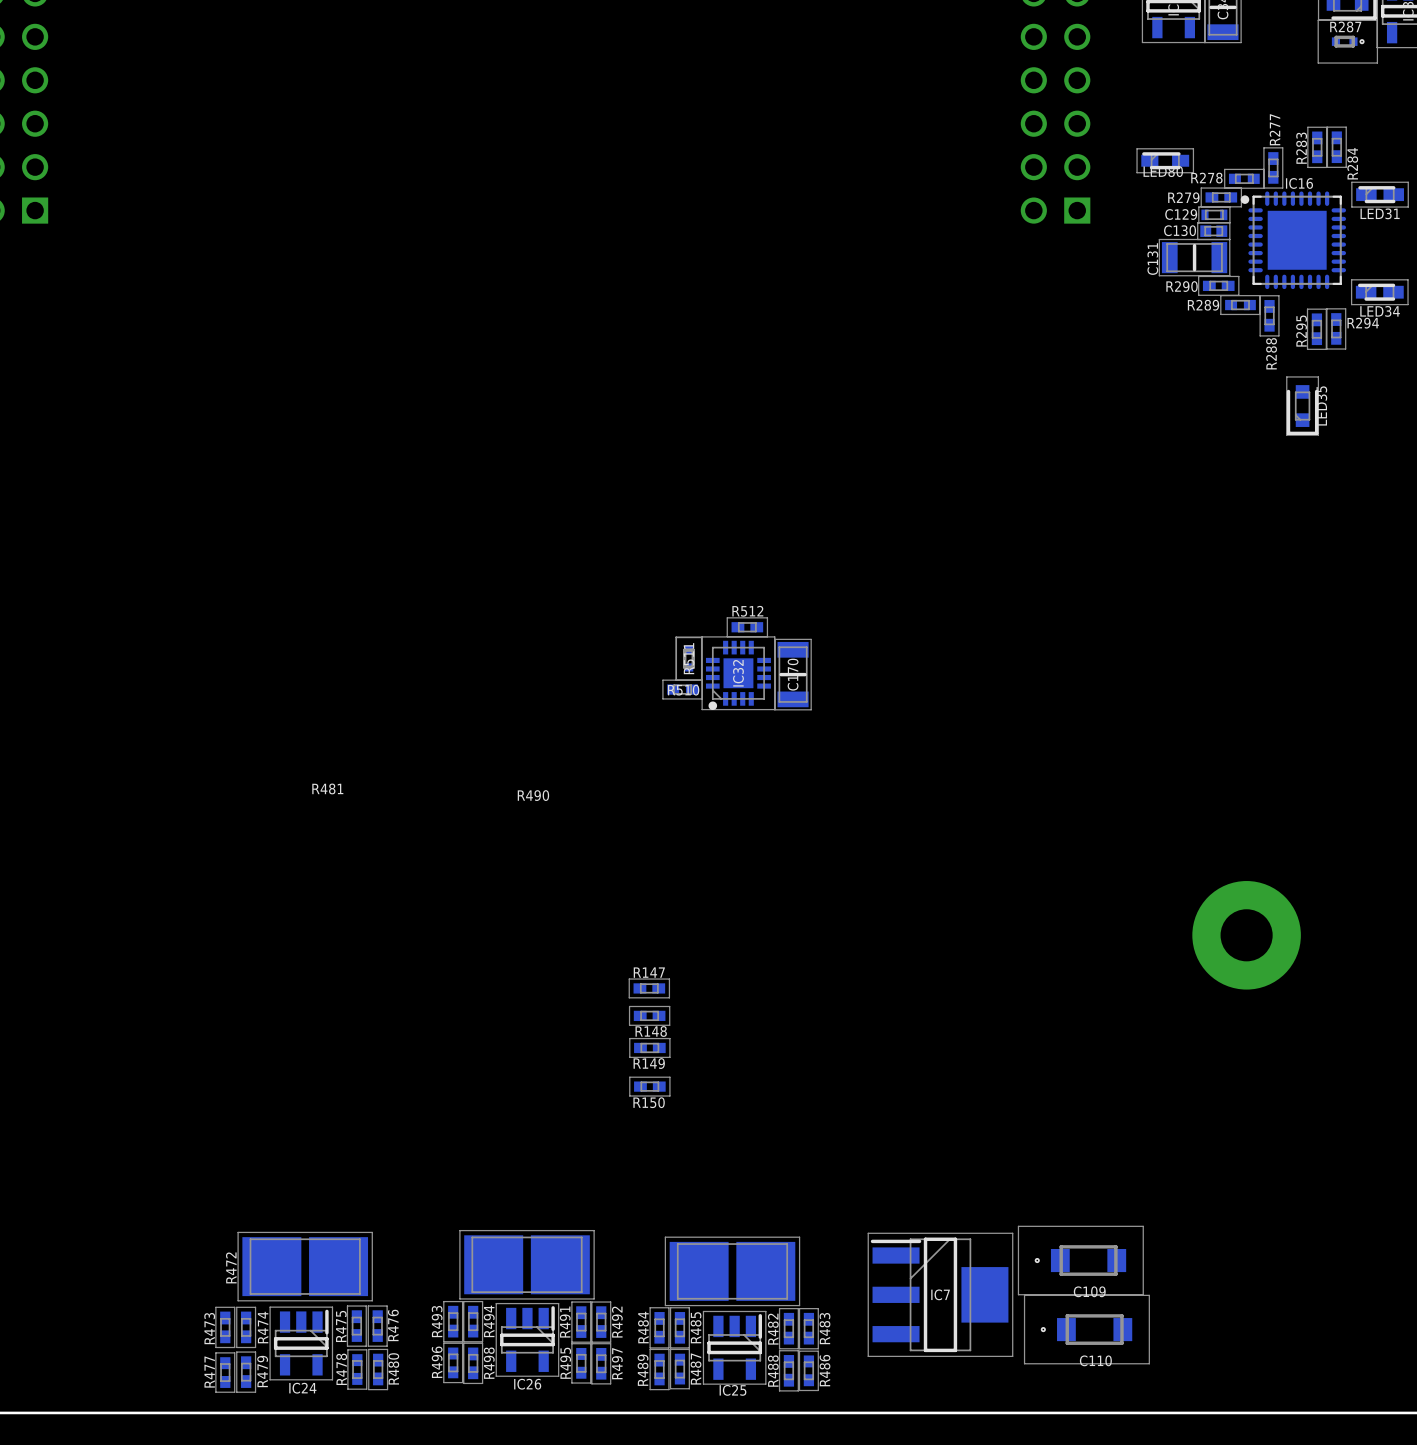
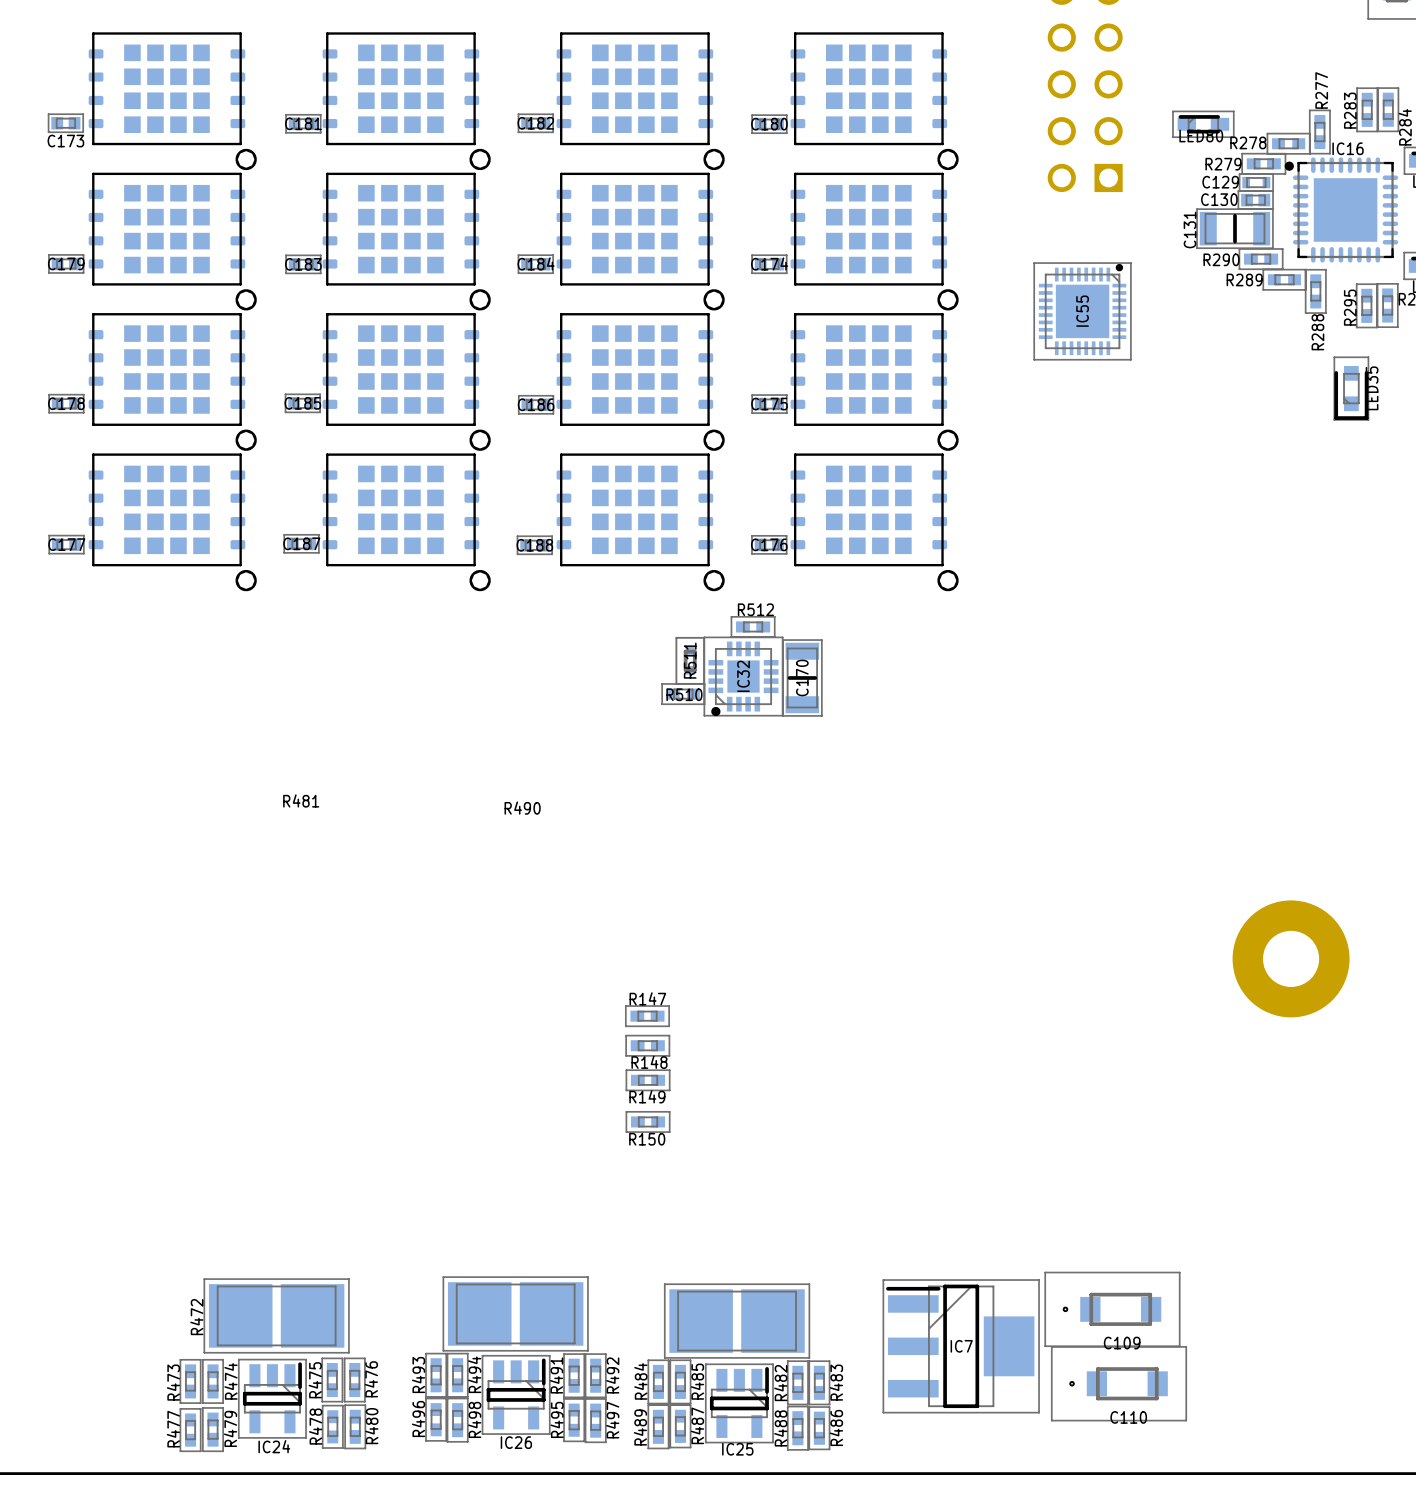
part: none -> (172, 101)
part: none -> (406, 101)
part: none -> (640, 101)
part: none -> (874, 101)
C173: none -> (65, 123)
C182: none -> (535, 123)
C181: none -> (303, 123)
C180: none -> (769, 124)
part: none -> (172, 241)
part: none -> (406, 241)
part: none -> (640, 241)
part: none -> (874, 241)
C179: none -> (66, 263)
C183: none -> (303, 264)
C184: none -> (535, 264)
C174: none -> (769, 264)
IC55: none -> (1082, 311)
part: none -> (172, 381)
part: none -> (406, 381)
part: none -> (640, 381)
part: none -> (874, 381)
C185: none -> (302, 403)
C178: none -> (66, 403)
C175: none -> (769, 404)
C186: none -> (536, 404)
part: none -> (172, 522)
part: none -> (406, 522)
part: none -> (640, 522)
part: none -> (874, 522)
C177: none -> (66, 544)
C187: none -> (301, 543)
C188: none -> (534, 545)
C176: none -> (769, 544)

